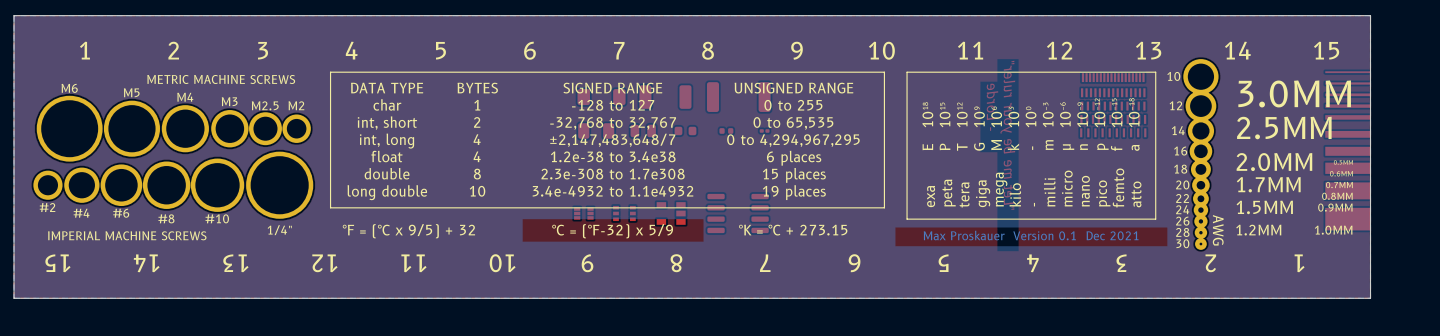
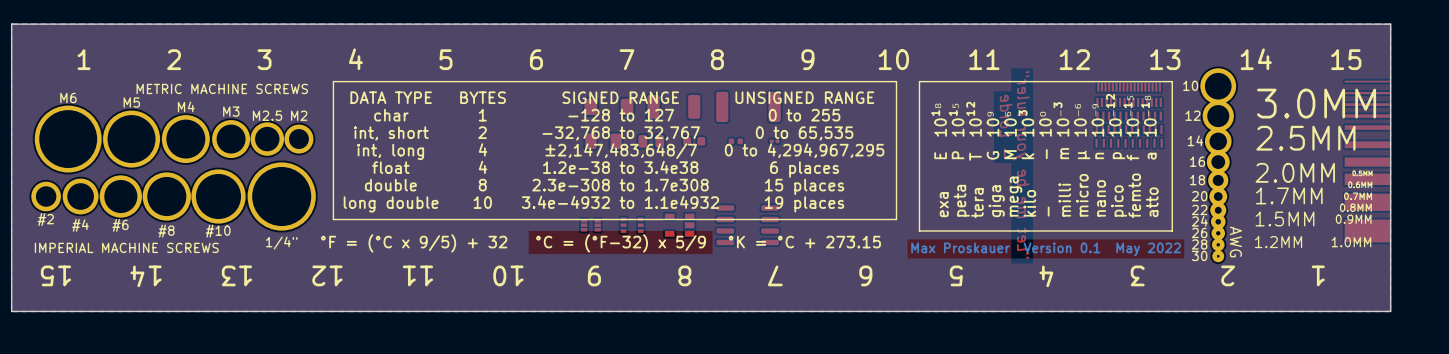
text: Max Proskauer Version 0.1 Dec 2021 (1031, 235) -> Max Proskauer Version 0.1 May 2022 (1046, 249)

